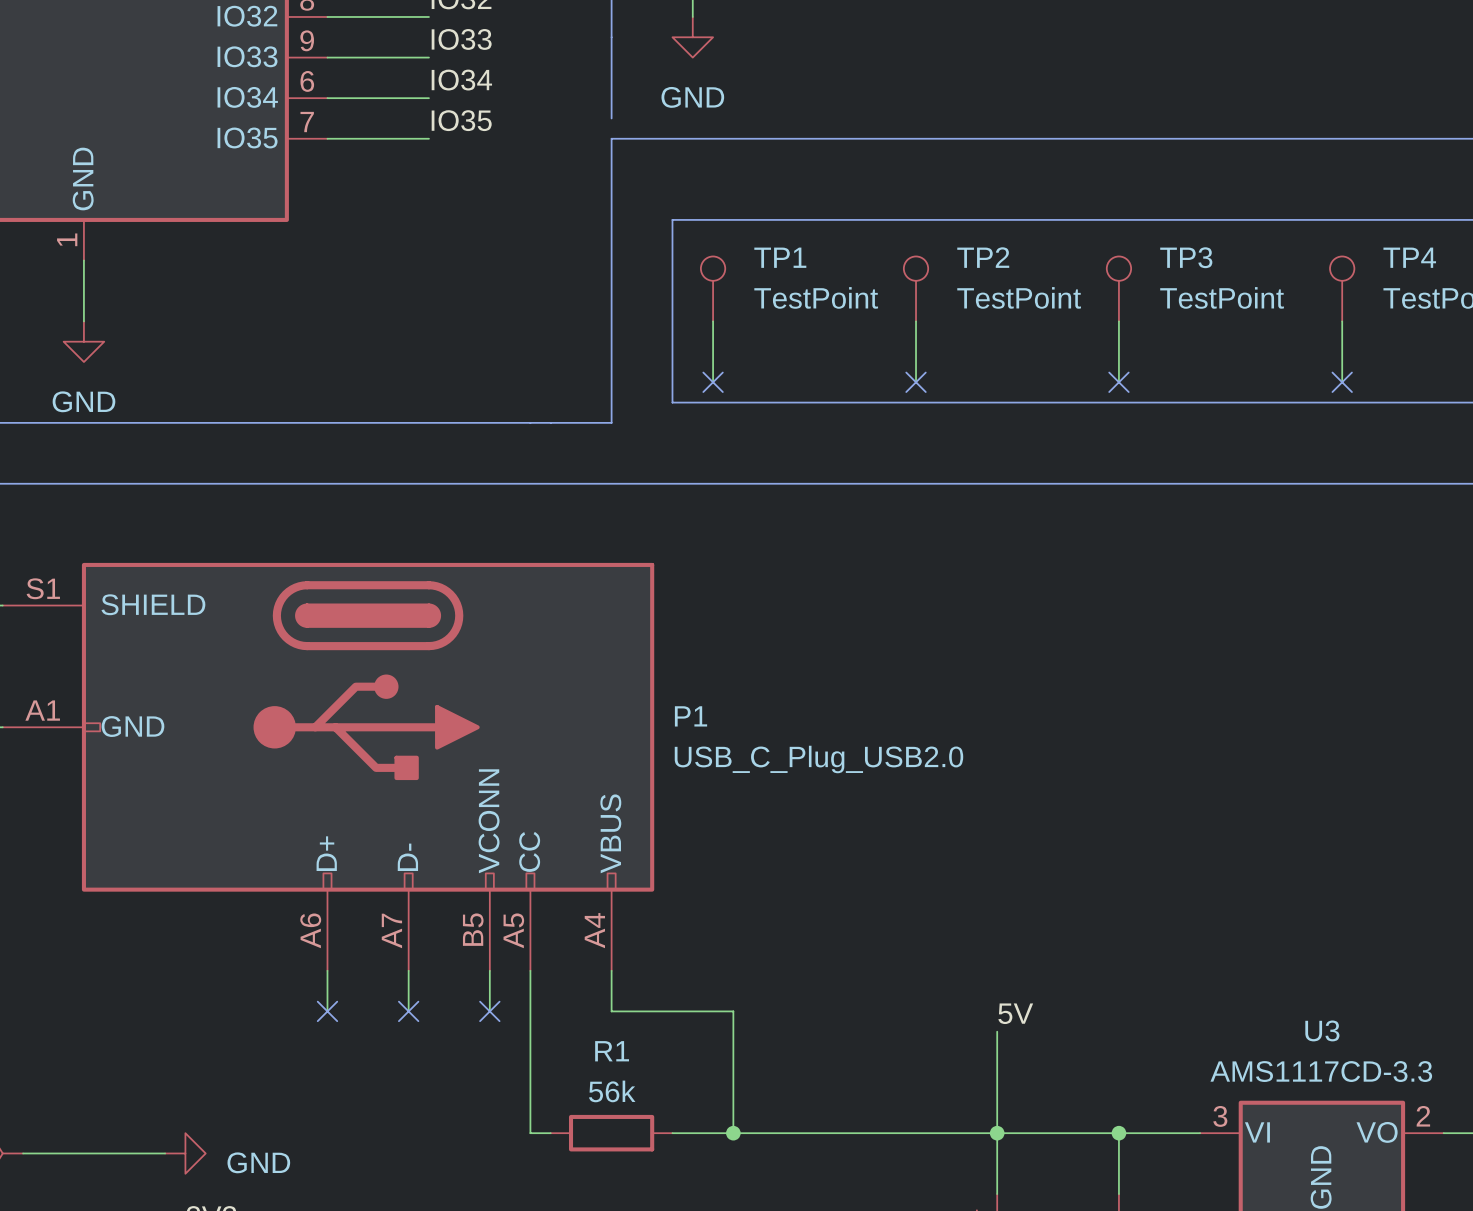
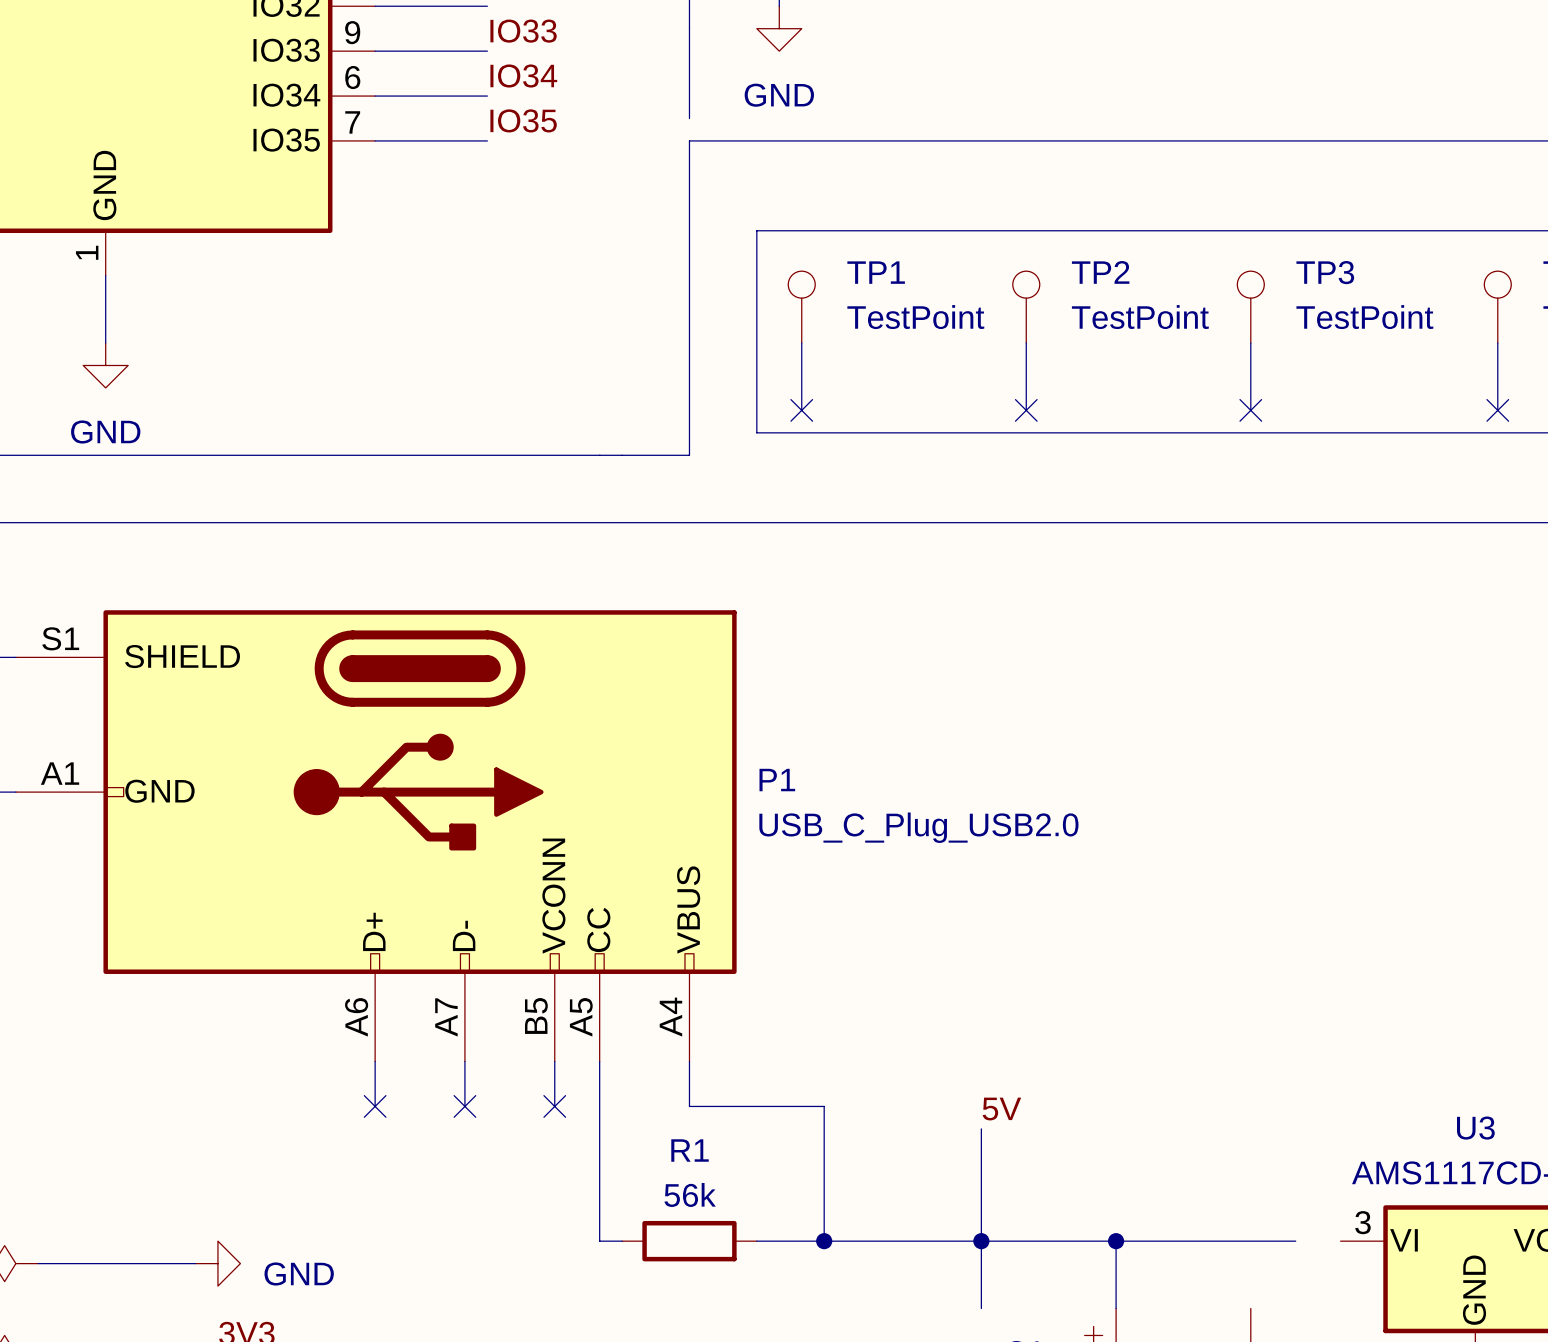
label position: 5V (1015, 1013) -> 5V (1001, 1109)
wire: none -> (981, 1128) (981, 1308)
wire: (997, 1031) (997, 1133) -> none
junction: none -> (981, 1241)
wire: (1118, 1133) (1118, 1194) -> none
junction: (1118, 1133) -> none
wire: (1159, 1133) (1200, 1133) -> none

